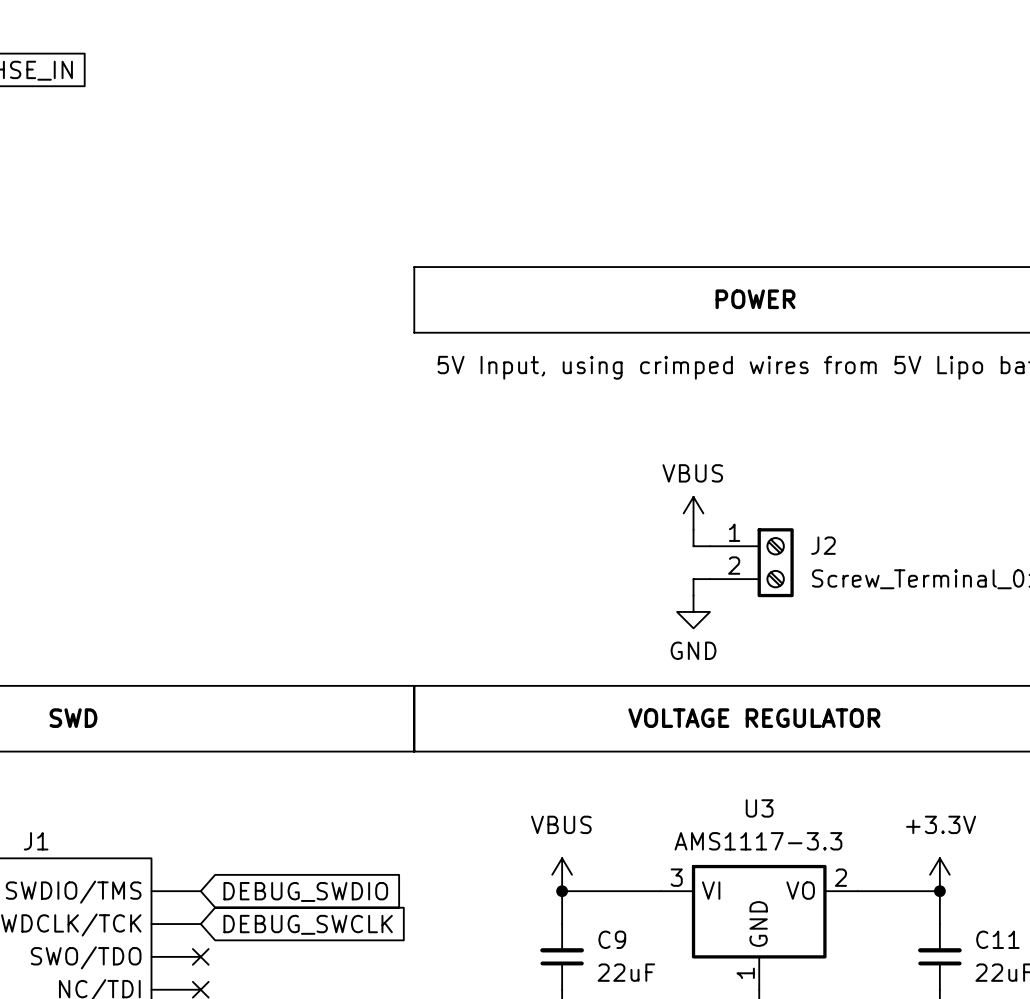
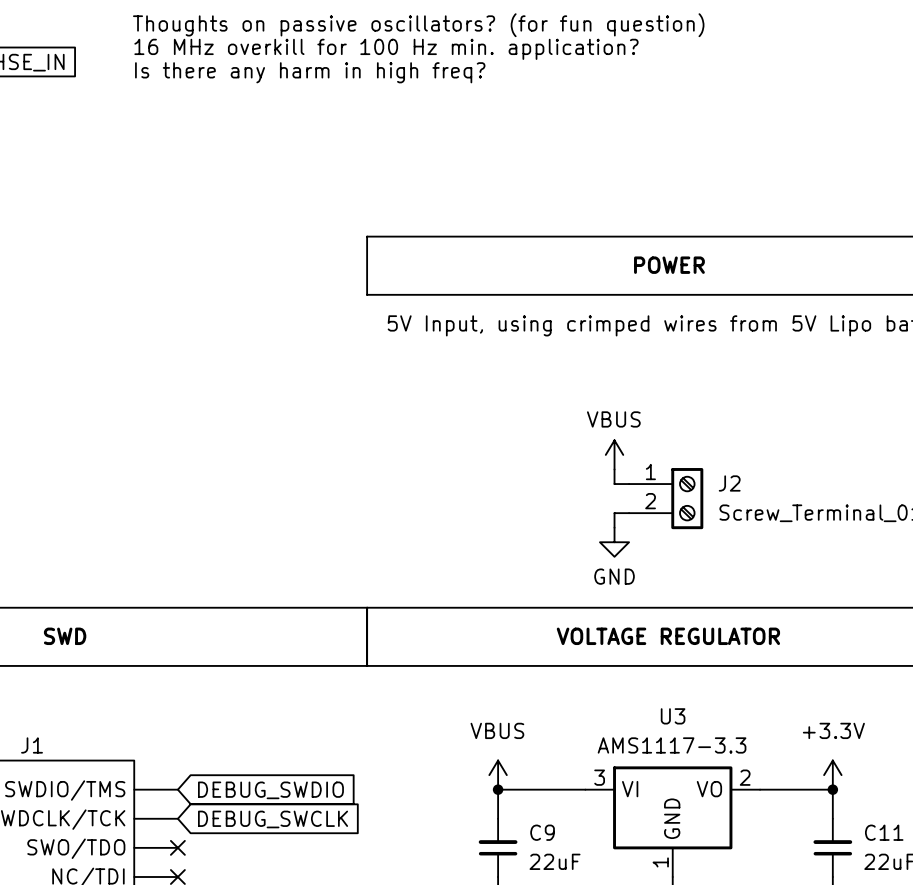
text: none -> Thoughts on passive oscillators? (for fun question) (418, 25)
text: none -> 16 MHz overkill for 100 Hz min. application? (386, 49)
text: none -> Is there any harm in high freq? (310, 72)

